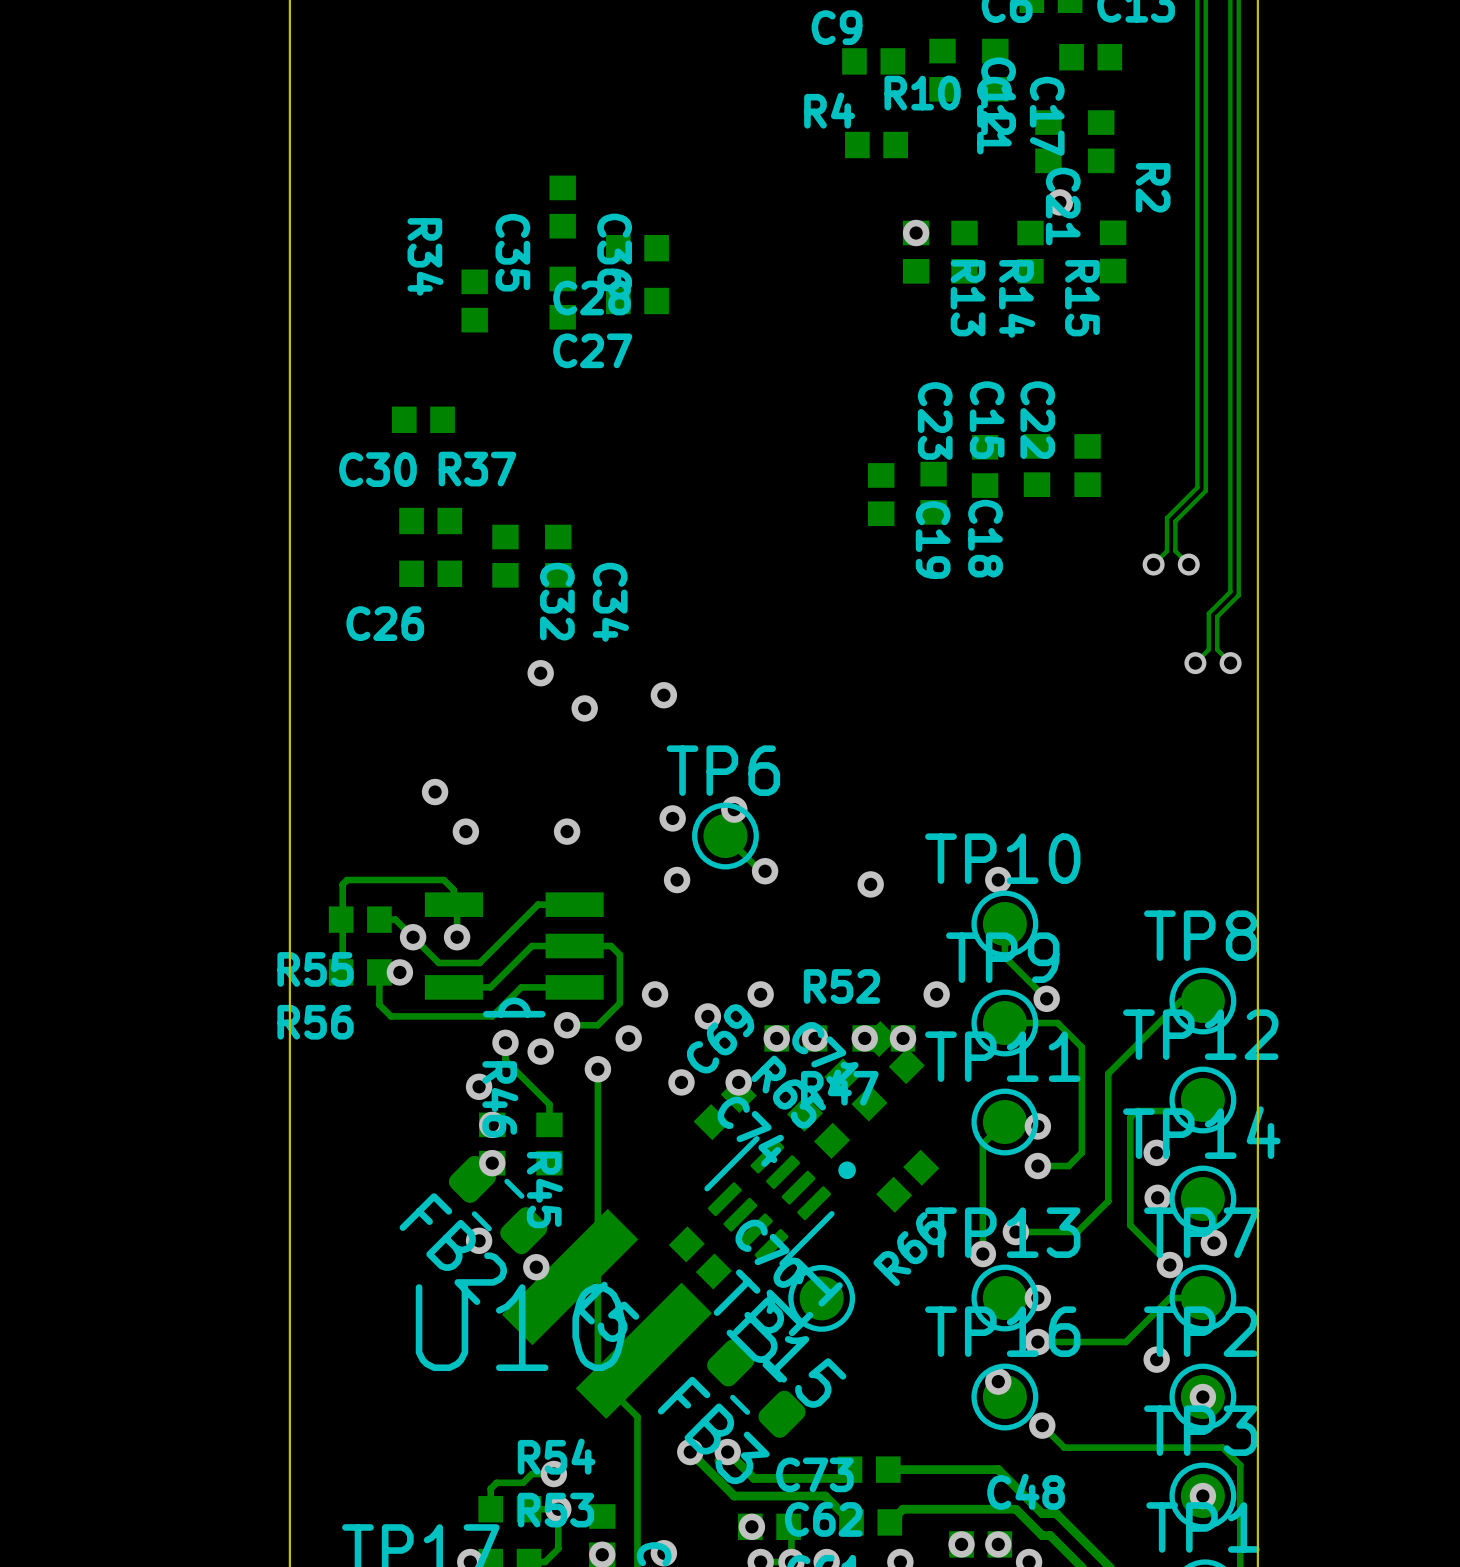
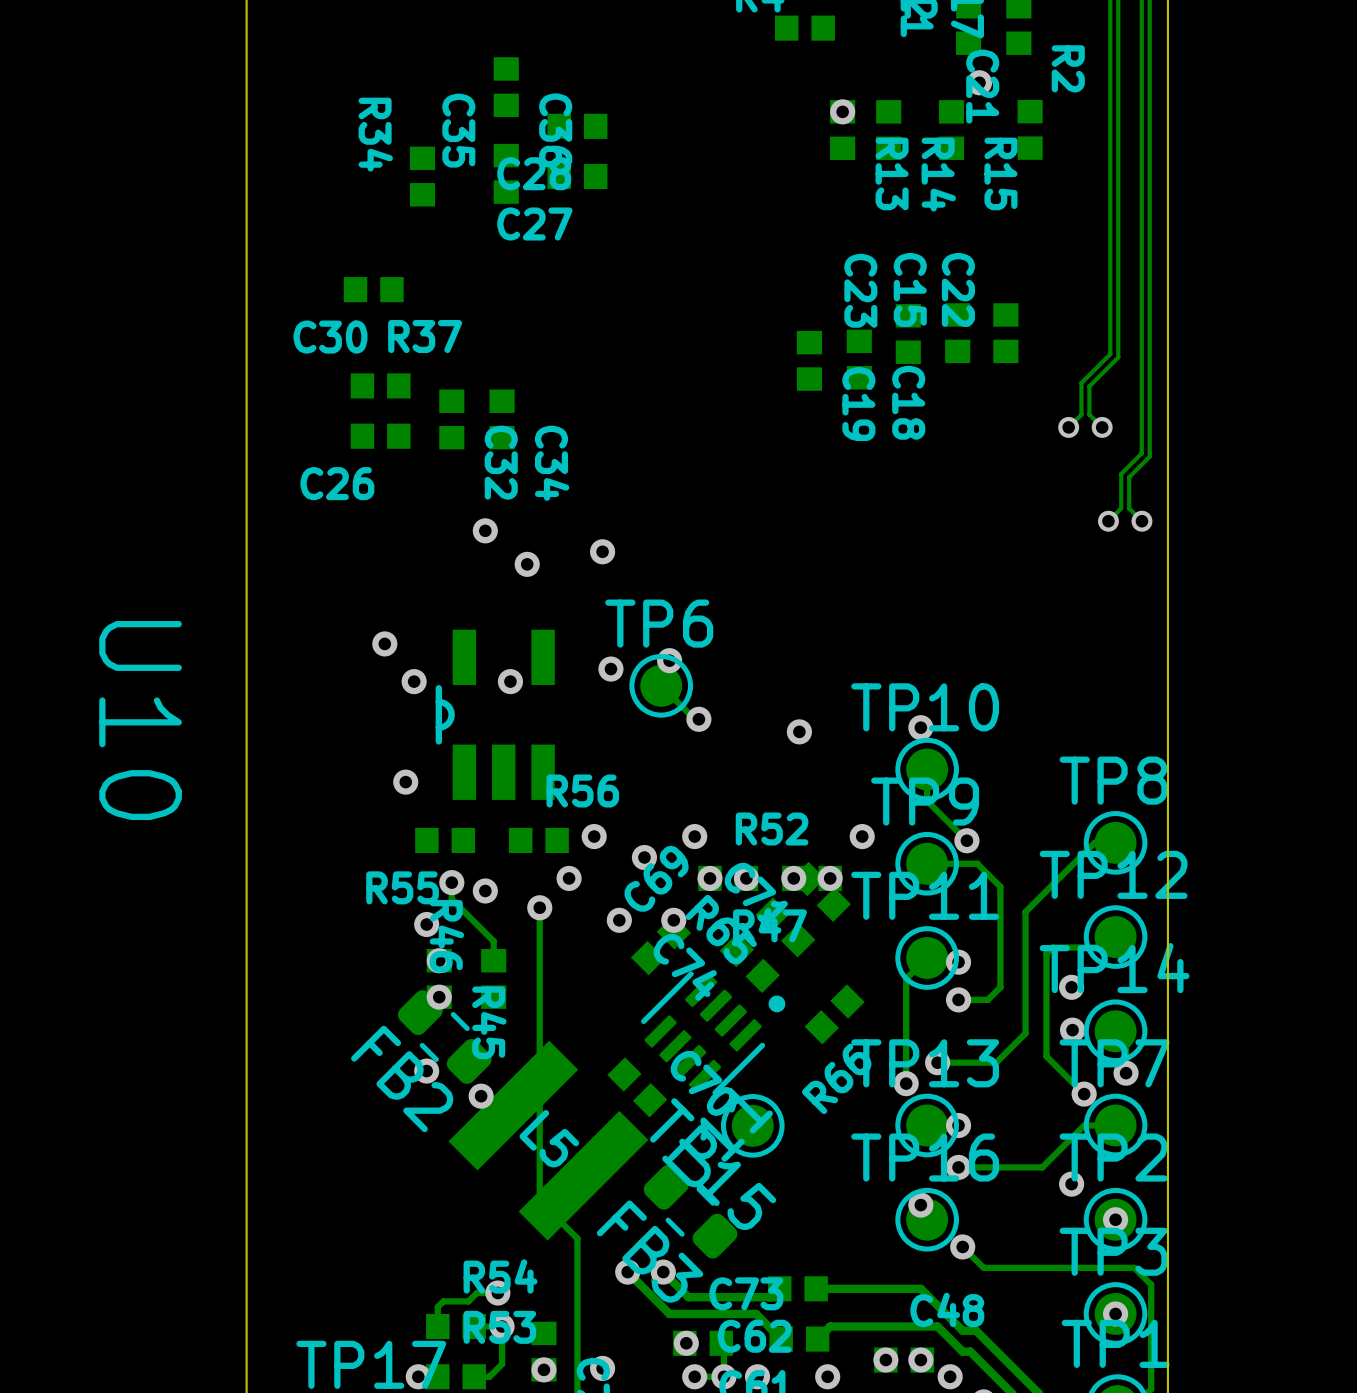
via: (677, 880) -> none
track: (574, 904) (538, 904) (479, 962) (438, 962) (395, 919) (379, 919) -> none
R55 position: (360, 919) -> (445, 840)
via: (413, 937) -> none
track: (457, 937) (457, 907) (453, 904) (453, 890) (443, 880) (347, 880) (342, 884) (342, 970) (341, 972) -> none
U10 rotation: 0° (514, 954) -> 90° clockwise (495, 714)
R56 position: (360, 972) -> (538, 840)
track: (399, 972) (379, 972) (379, 1004) (391, 1016) (492, 1016) (521, 987) (574, 987) -> none
via: (399, 972) -> none
track: (453, 987) (490, 987) (531, 946) (611, 946) (619, 954) (619, 1003) (597, 1025) (567, 1025) -> none
R56 name position: R56 (315, 1022) -> R56 (582, 791)
via: (567, 1025) -> none

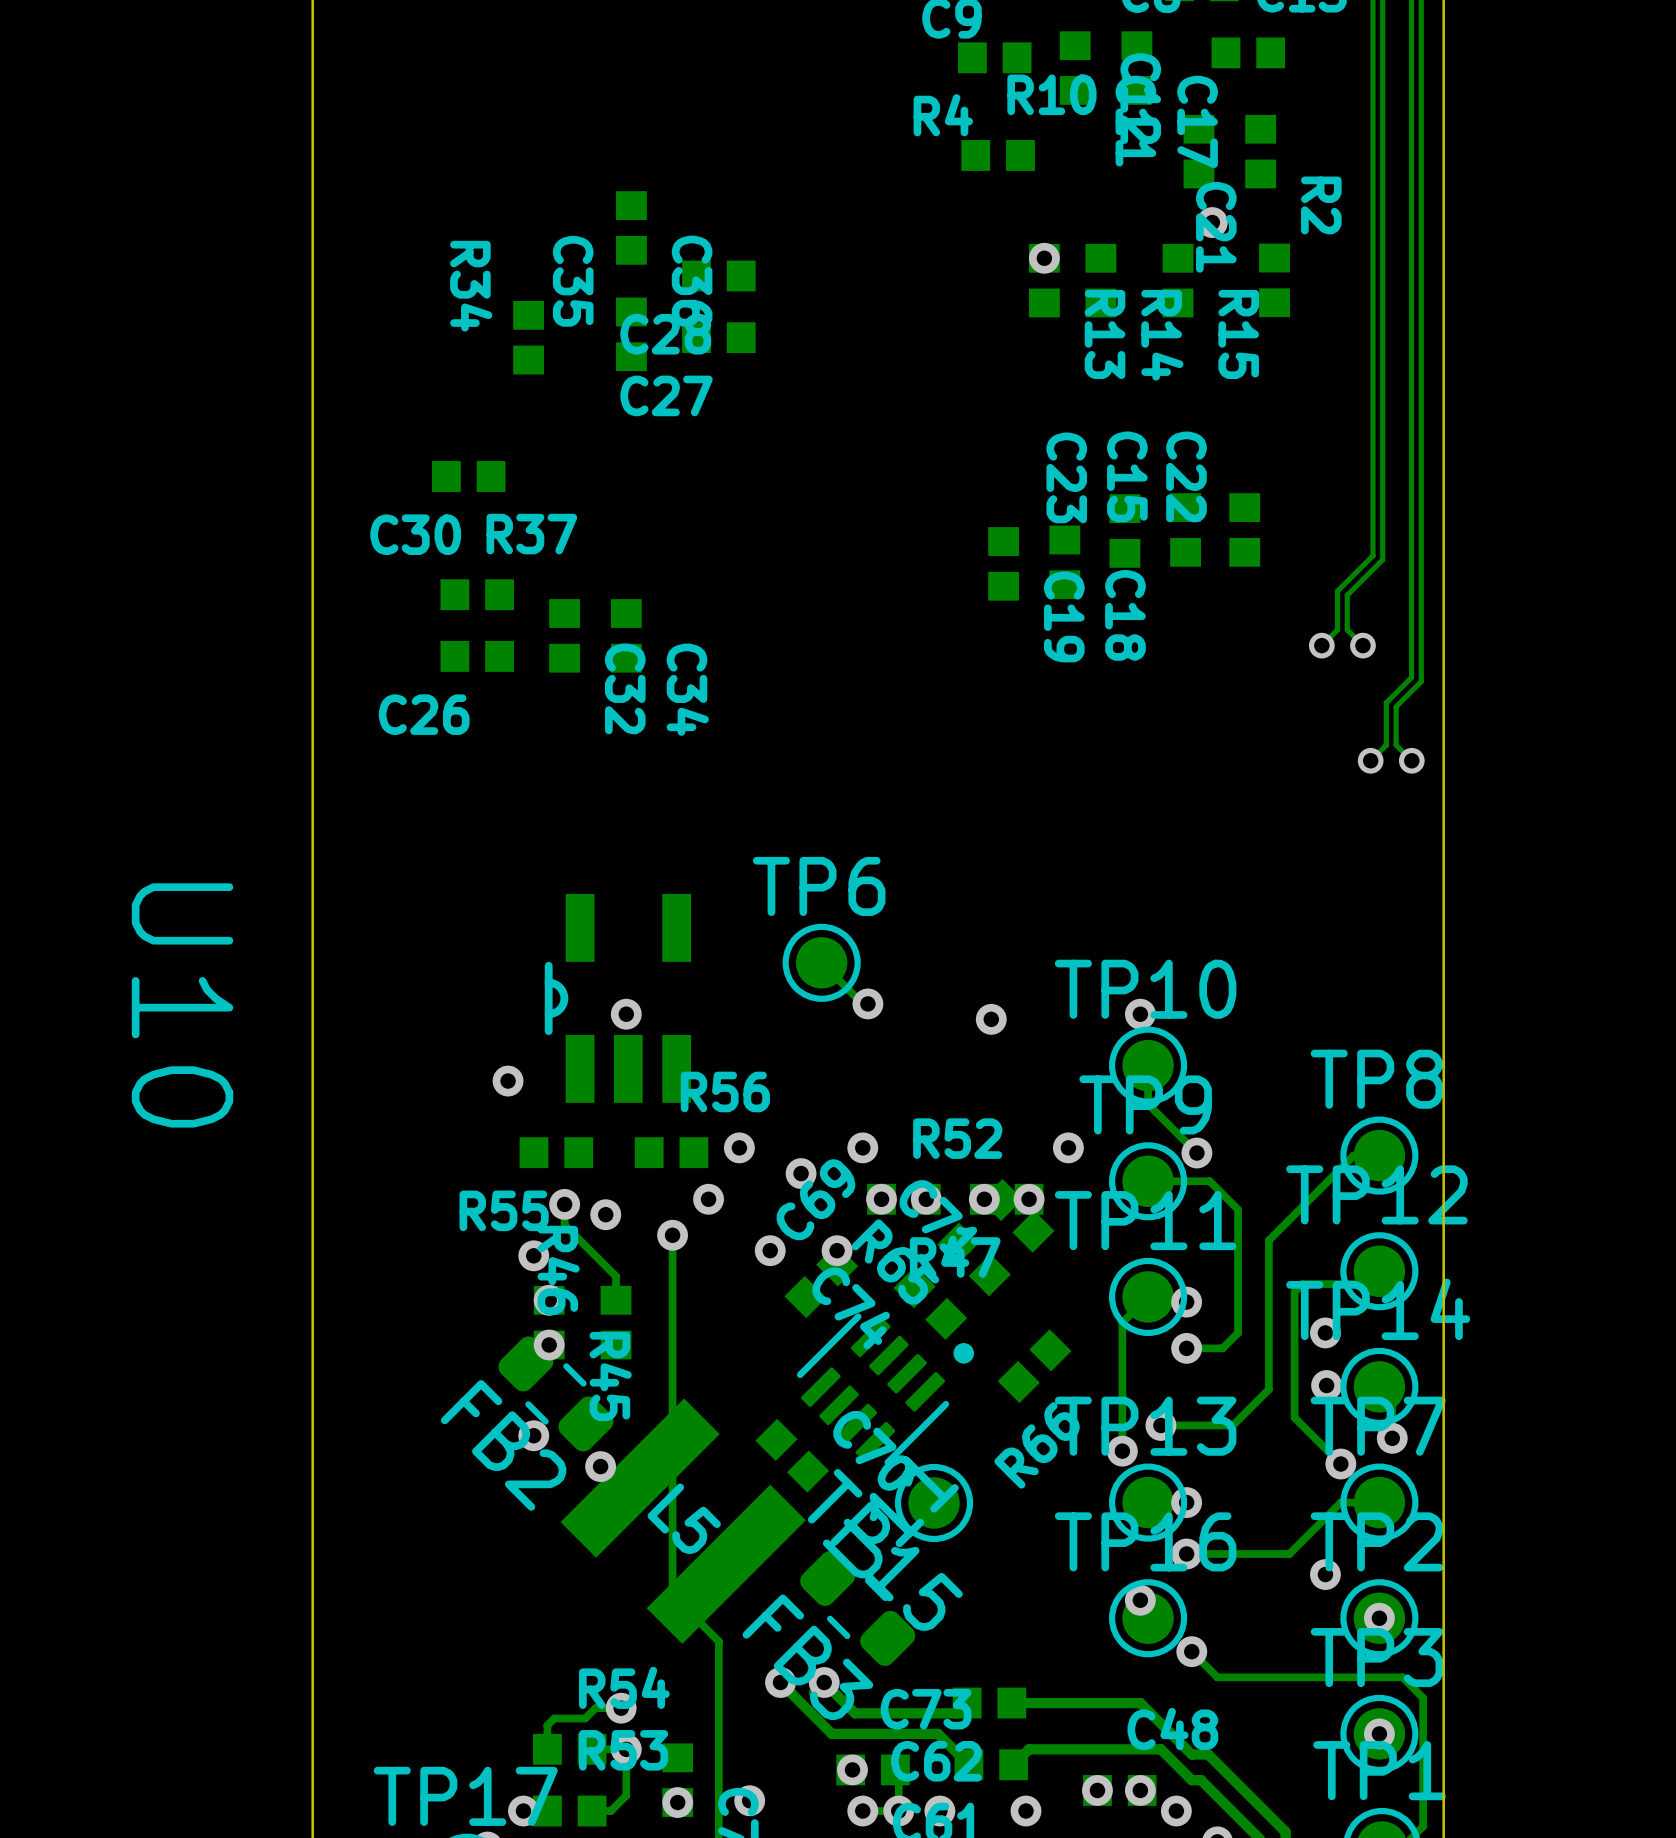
via: (485, 530) -> none
via: (602, 551) -> none
via: (527, 564) -> none
via: (384, 643) -> none
via: (669, 660) -> none
via: (610, 669) -> none
via: (414, 681) -> none
via position: (510, 681) -> (626, 1014)

